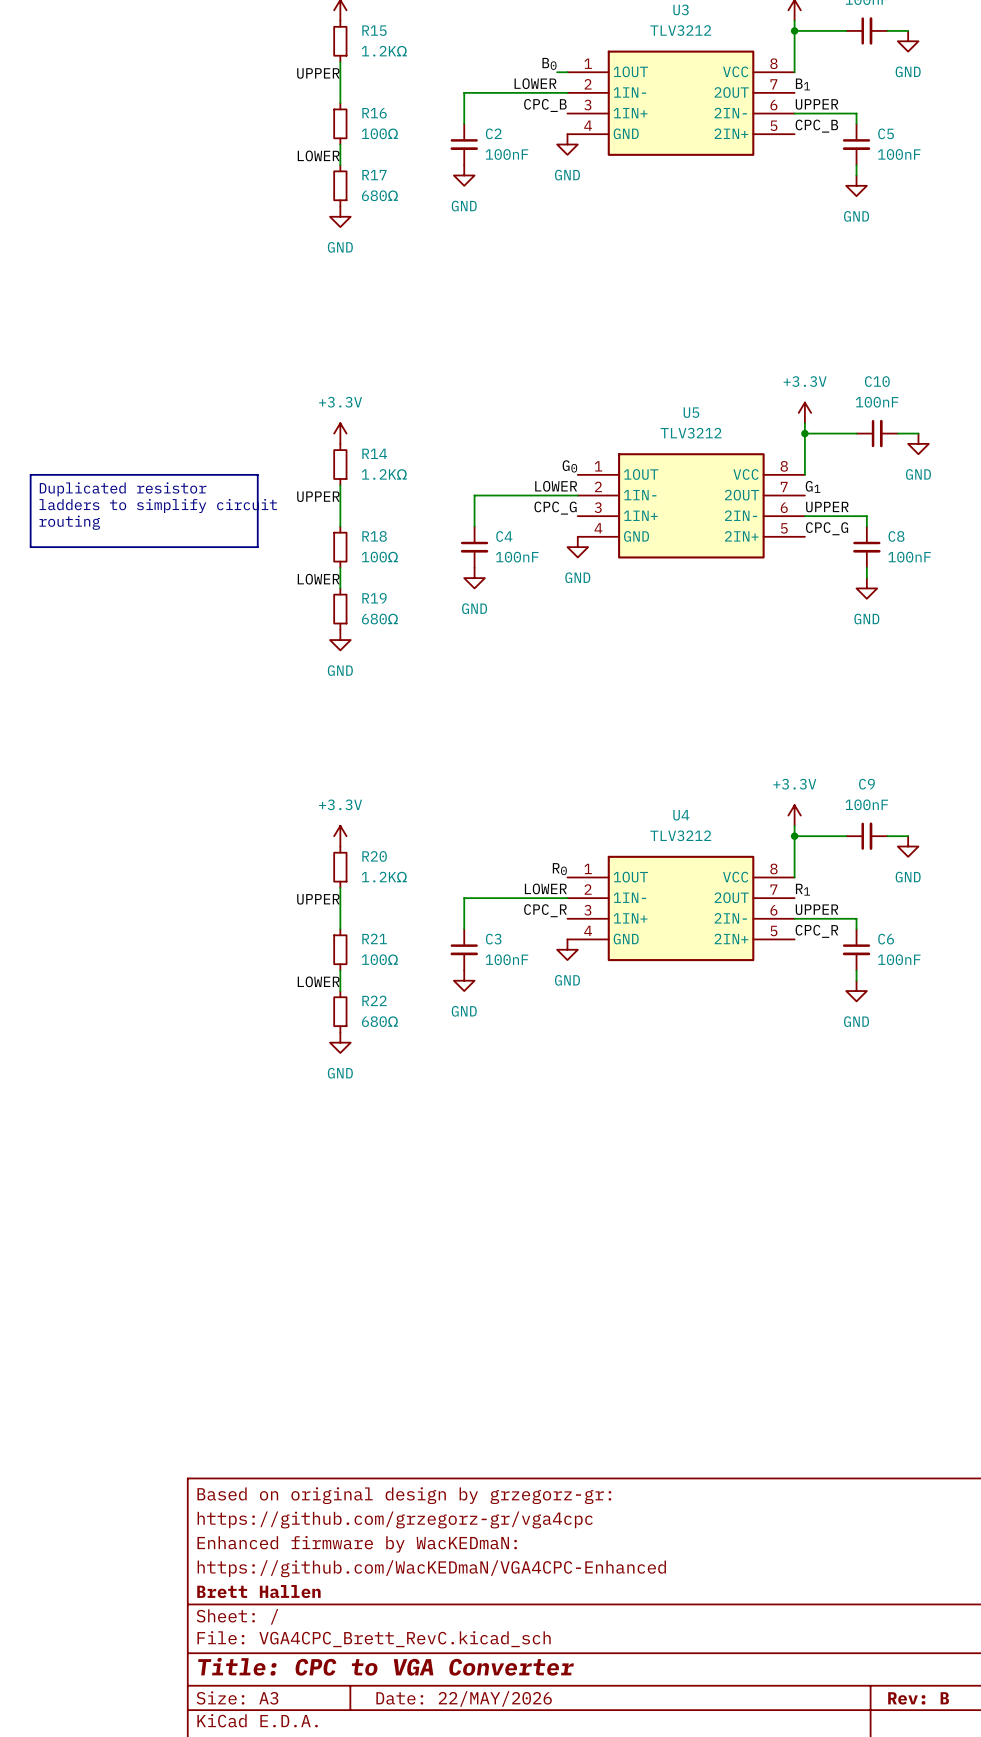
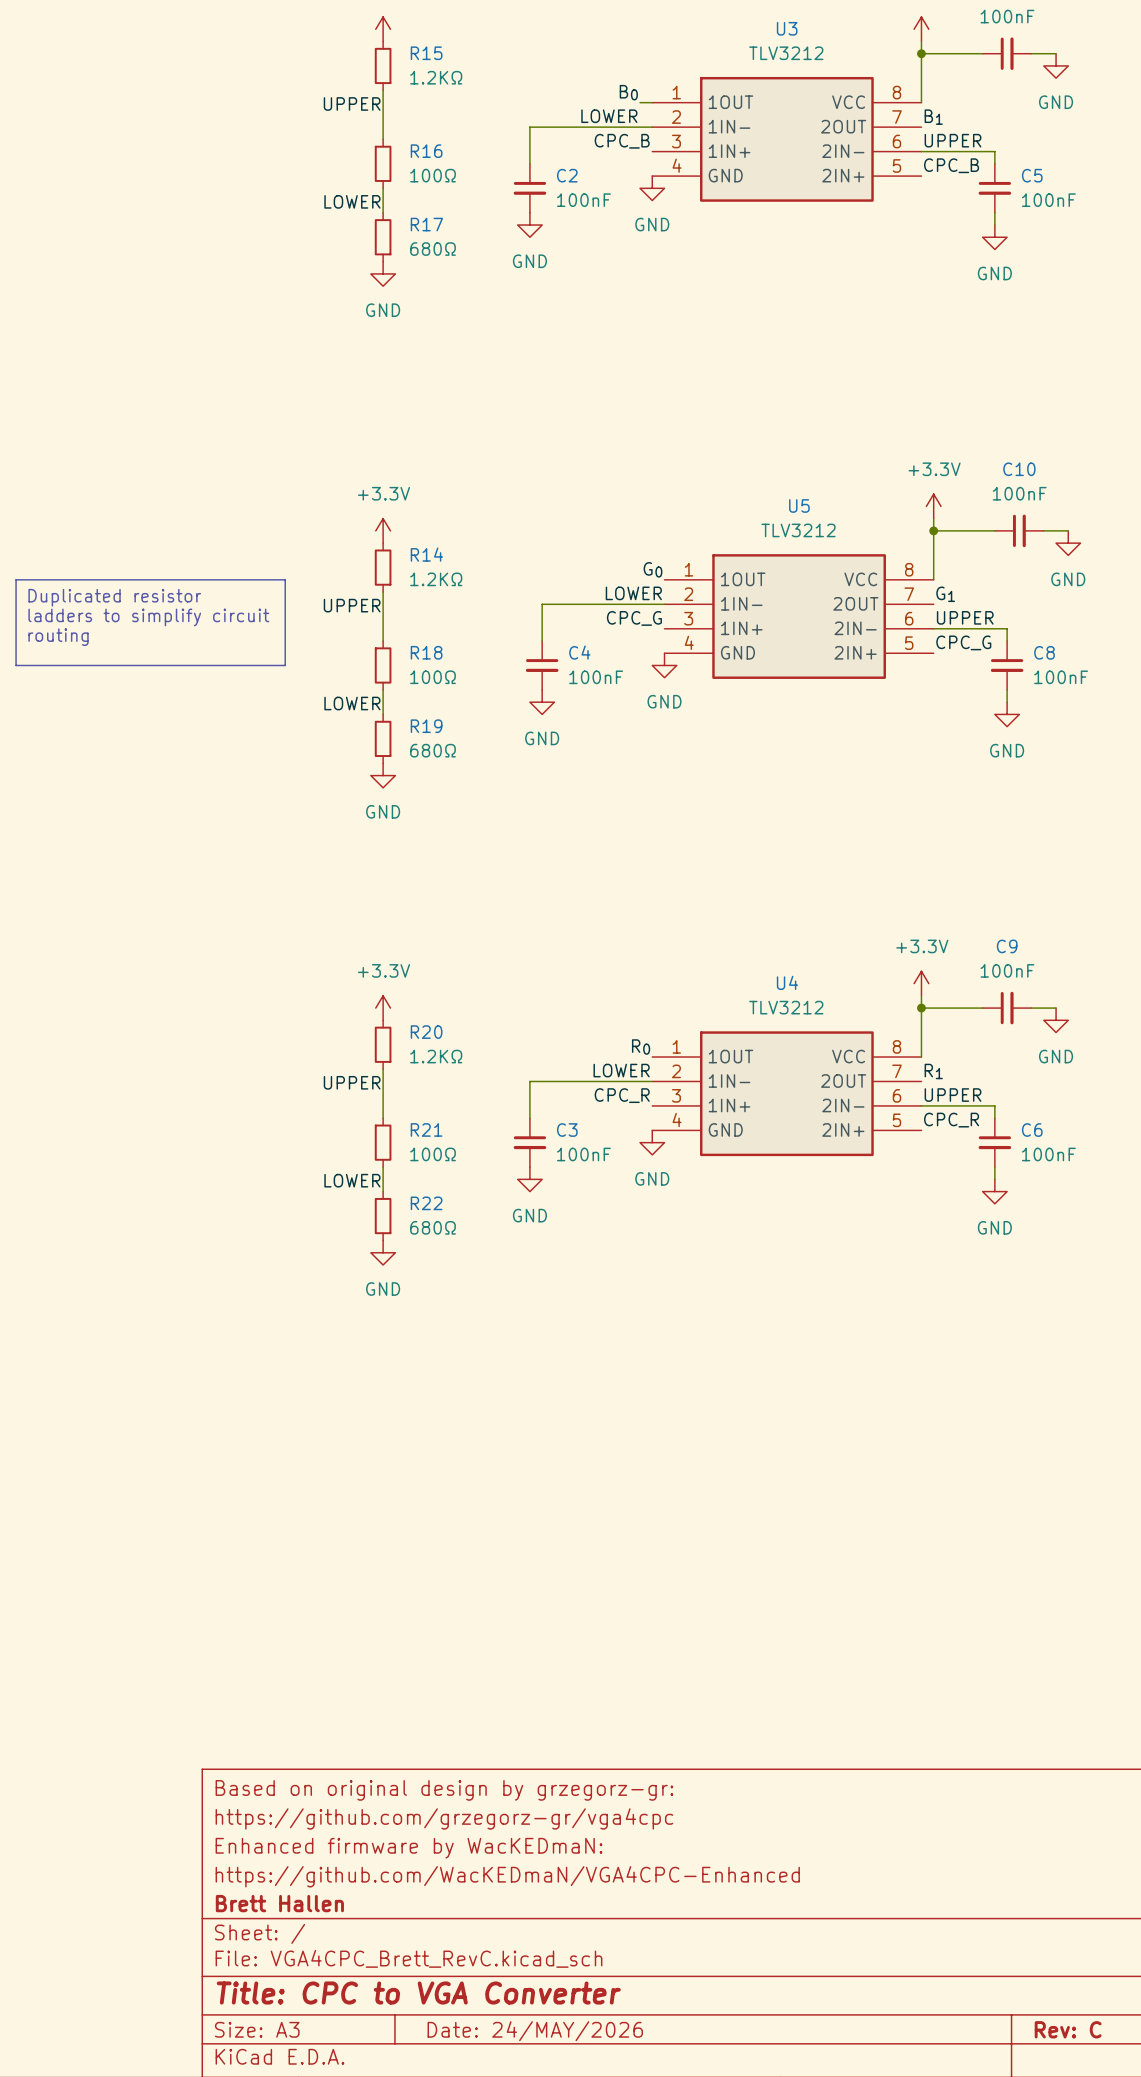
title block: Date: 22/MAY/2026 (464, 1698) -> Date: 24/MAY/2026 (535, 2031)
title block: Rev: B (918, 1698) -> Rev: C (1068, 2029)

